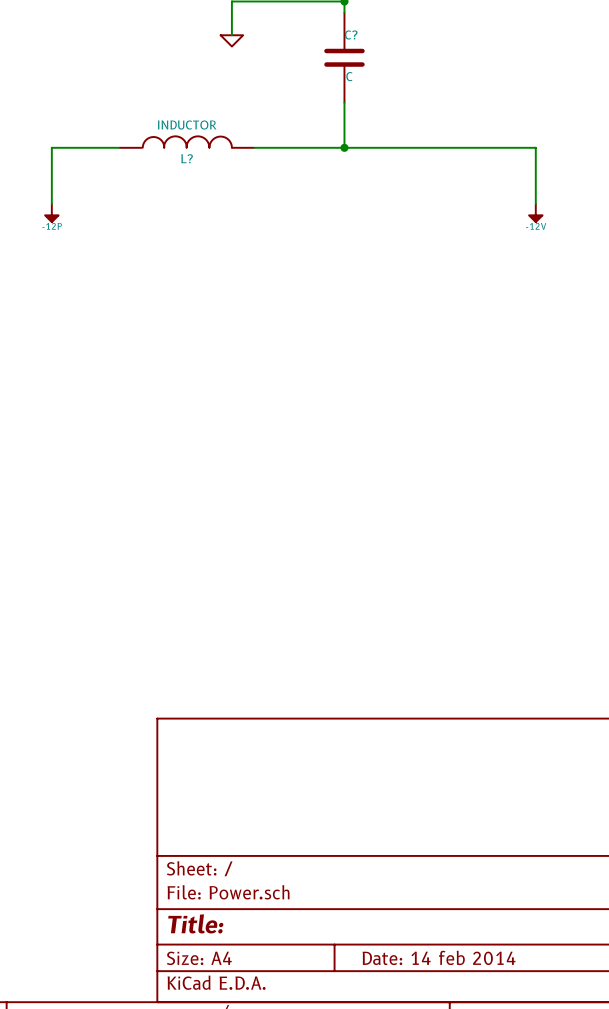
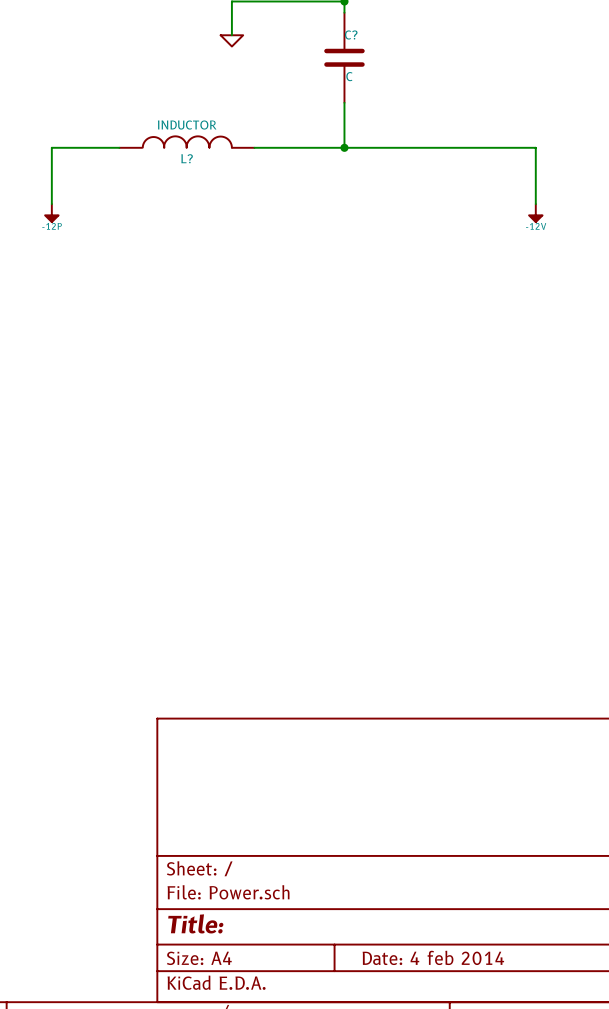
title block: Date: 14 feb 2014 (439, 957) -> Date: 4 feb 2014 (433, 957)

